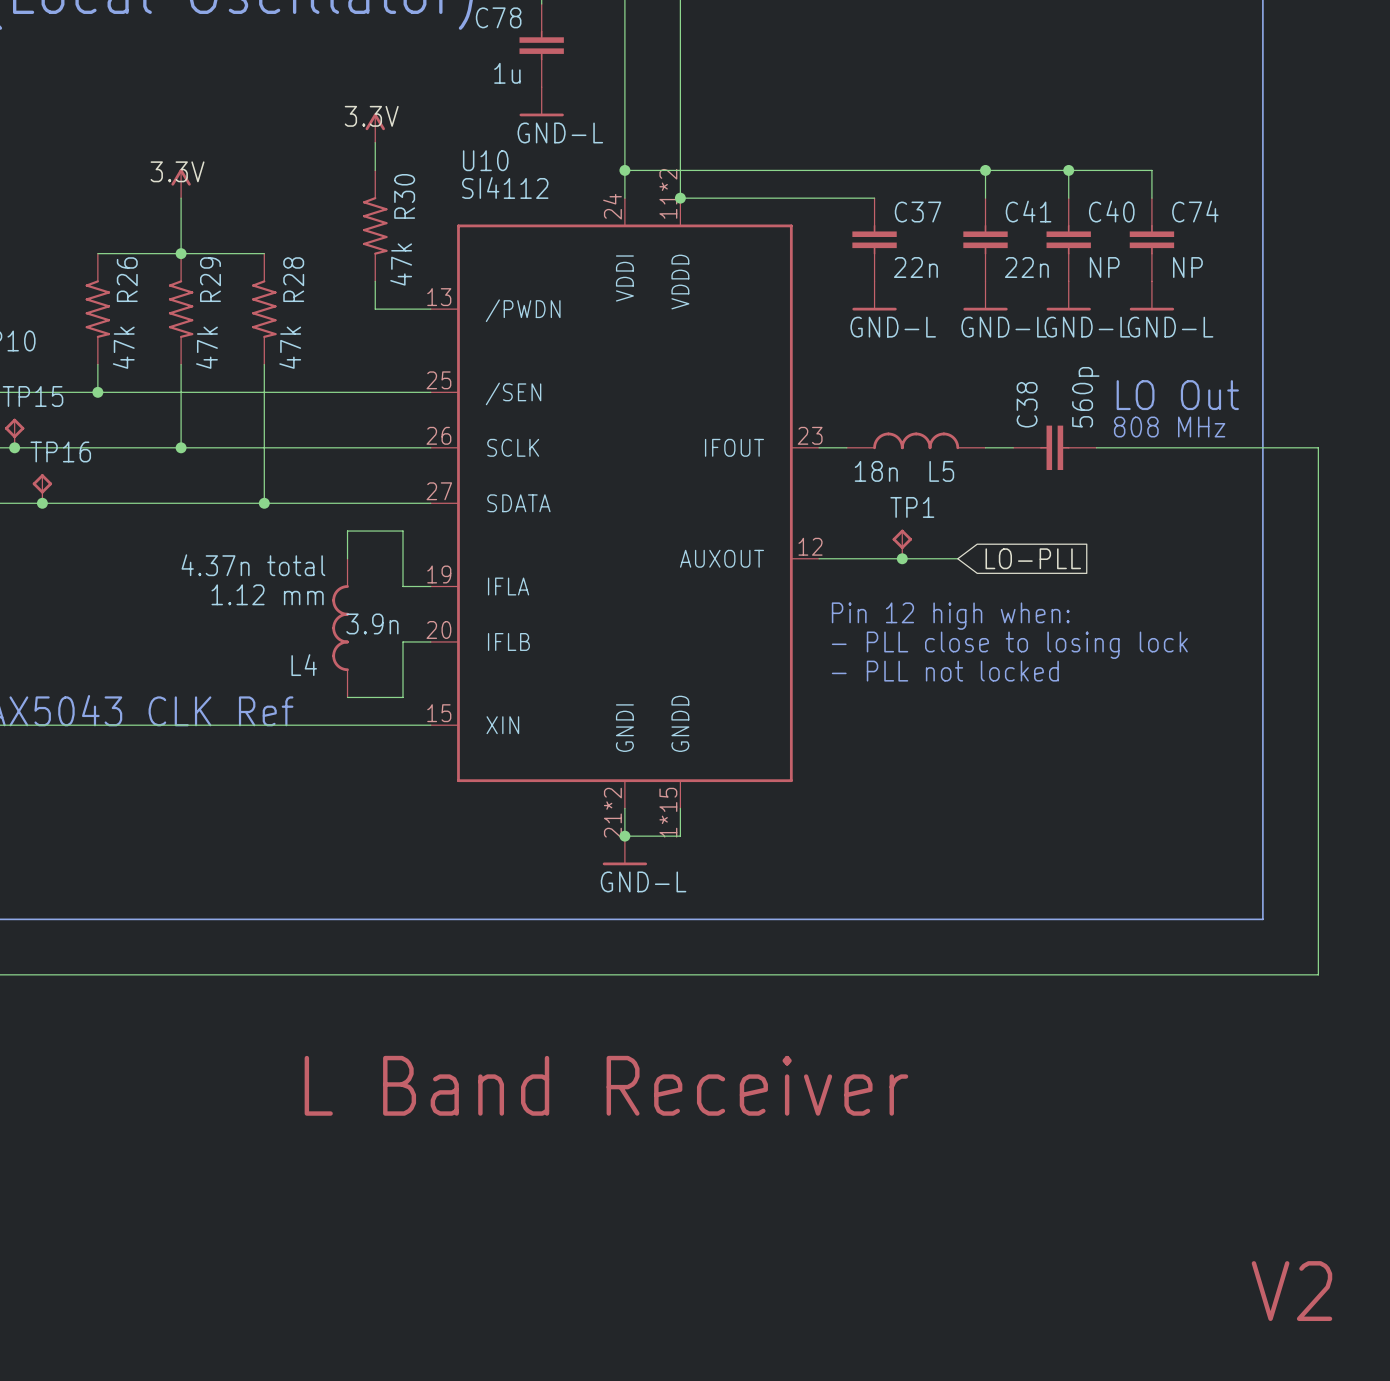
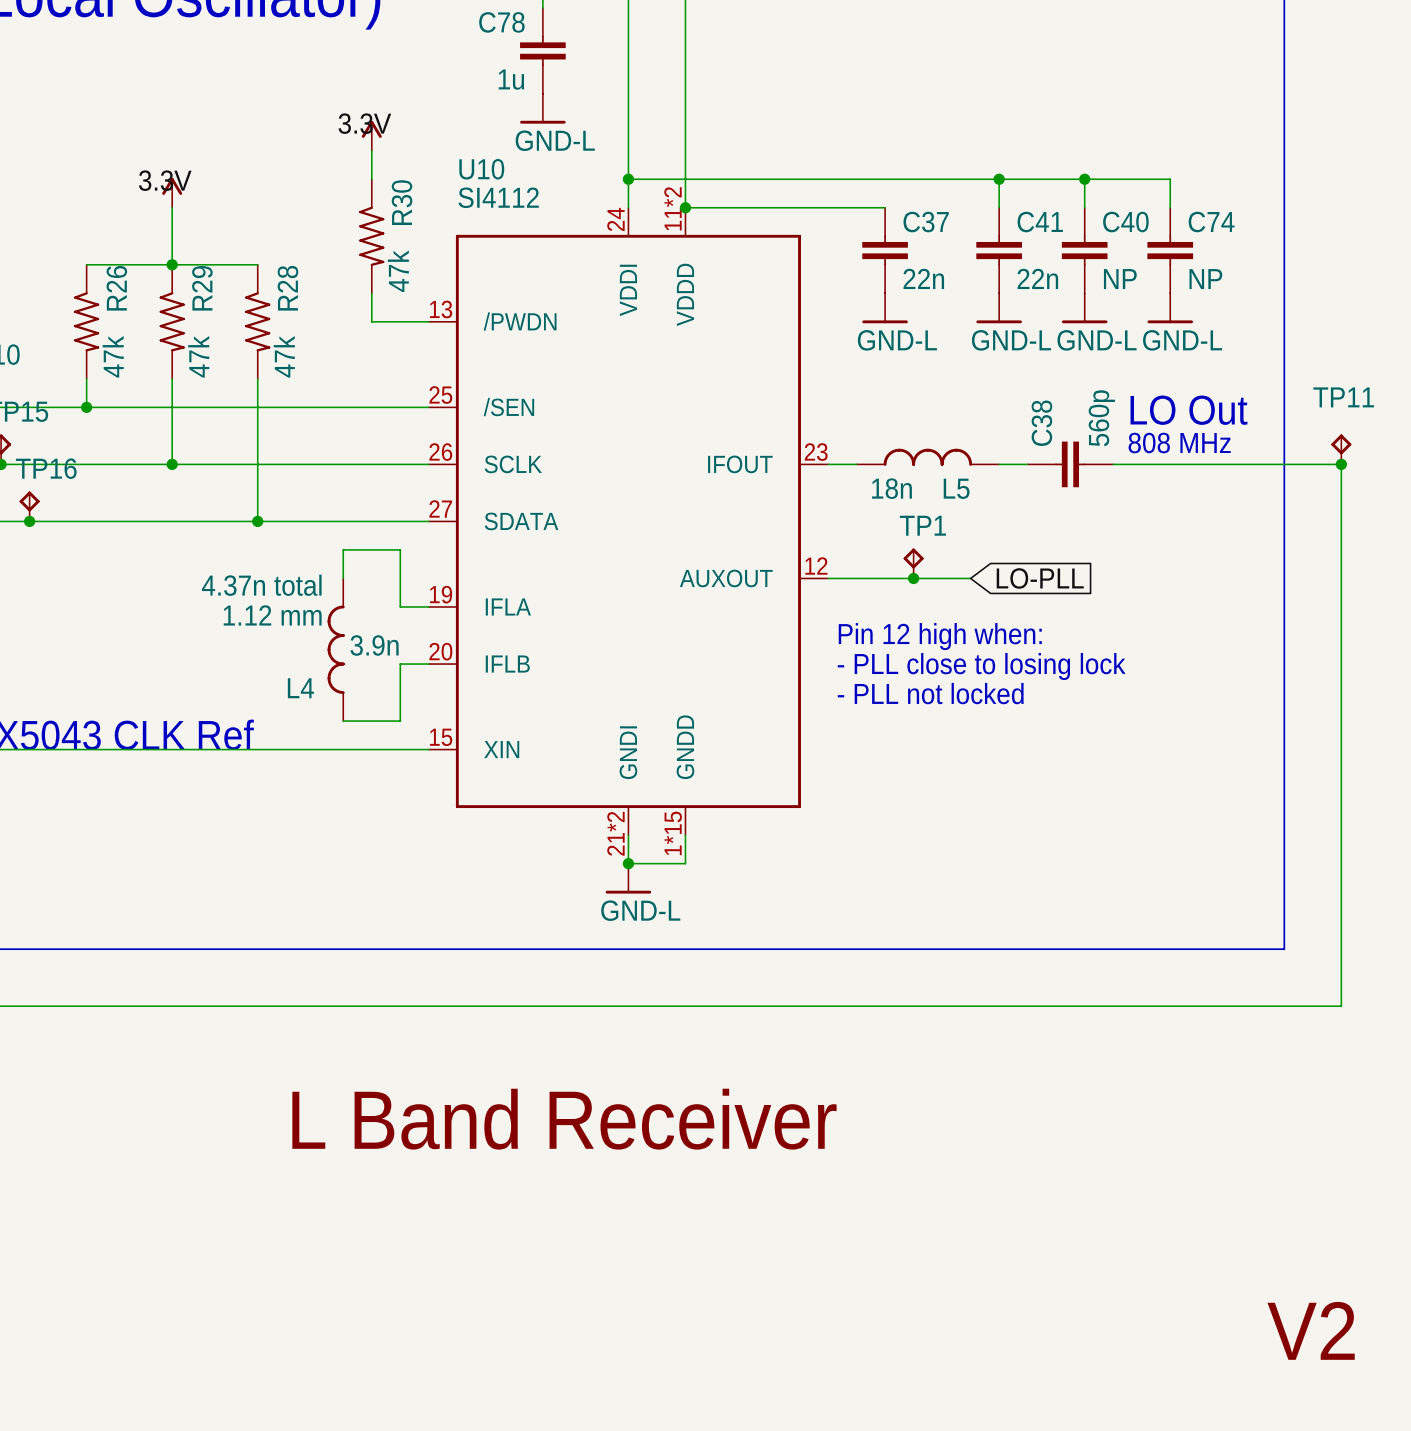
TP11: none -> (1341, 449)
junction: none -> (1341, 464)

